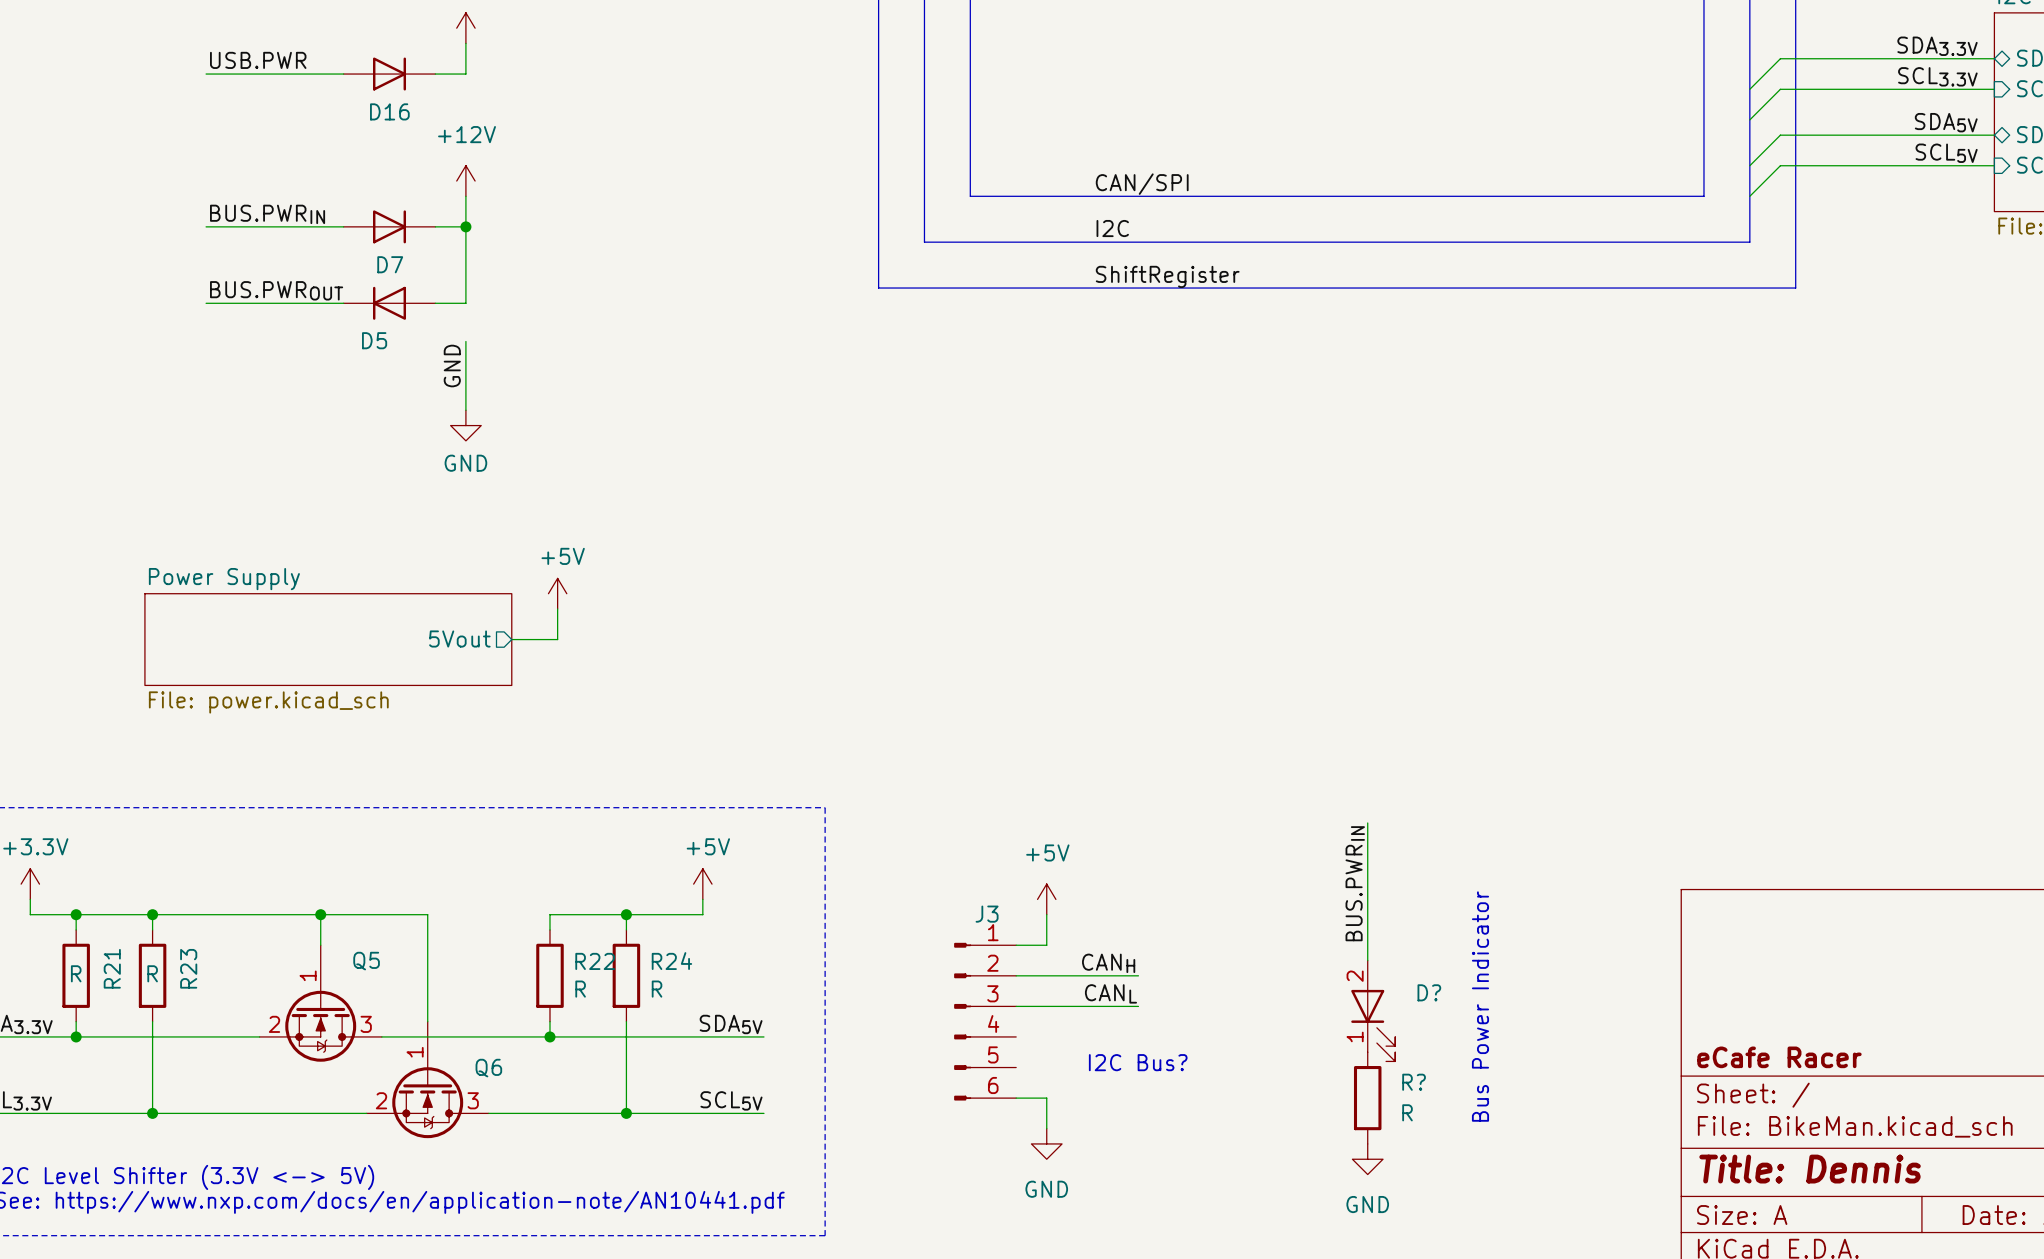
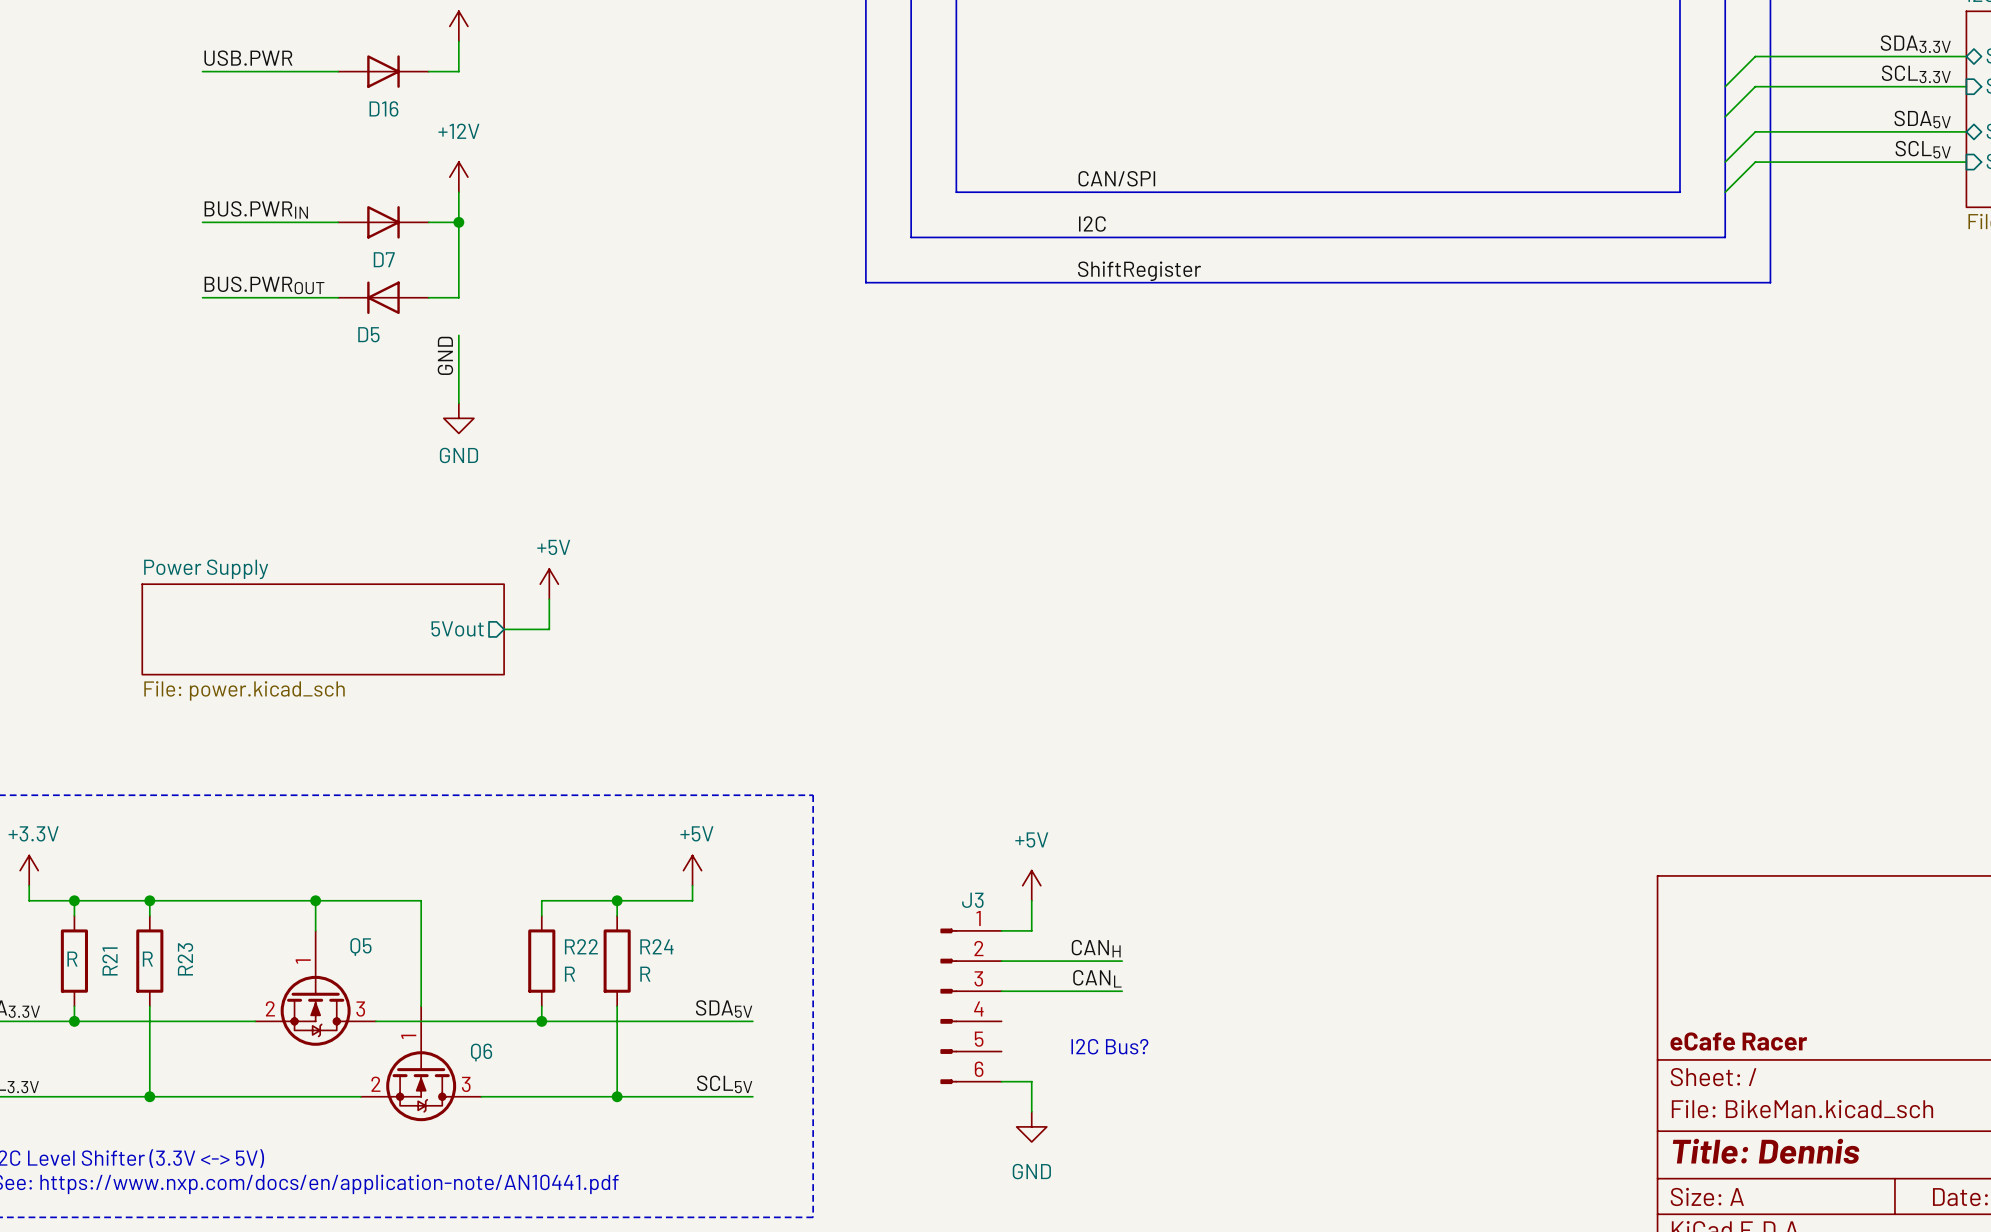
wire: (1367, 822) (1367, 960) -> none
label: BUS.PWRIN (1355, 883) -> none
text: Bus Power Indicator (1480, 1006) -> none
D?: (1373, 1010) -> none
R?: R (1367, 1098) -> none
power symbol: GND (1367, 1159) -> none

